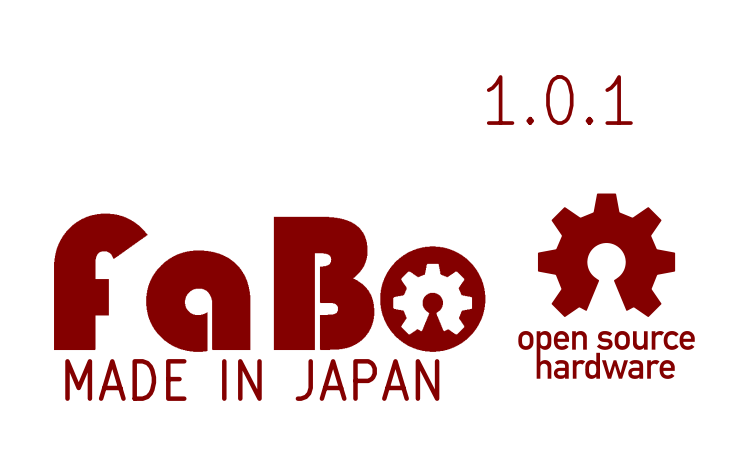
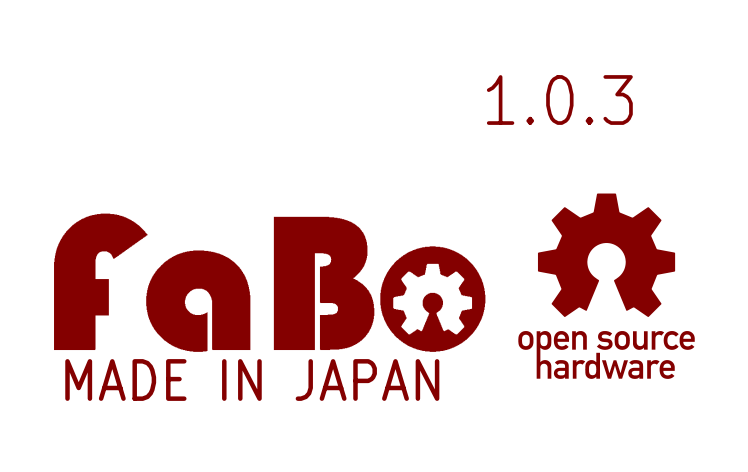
text: 1.0.1 (559, 100) -> 1.0.3 (559, 100)

